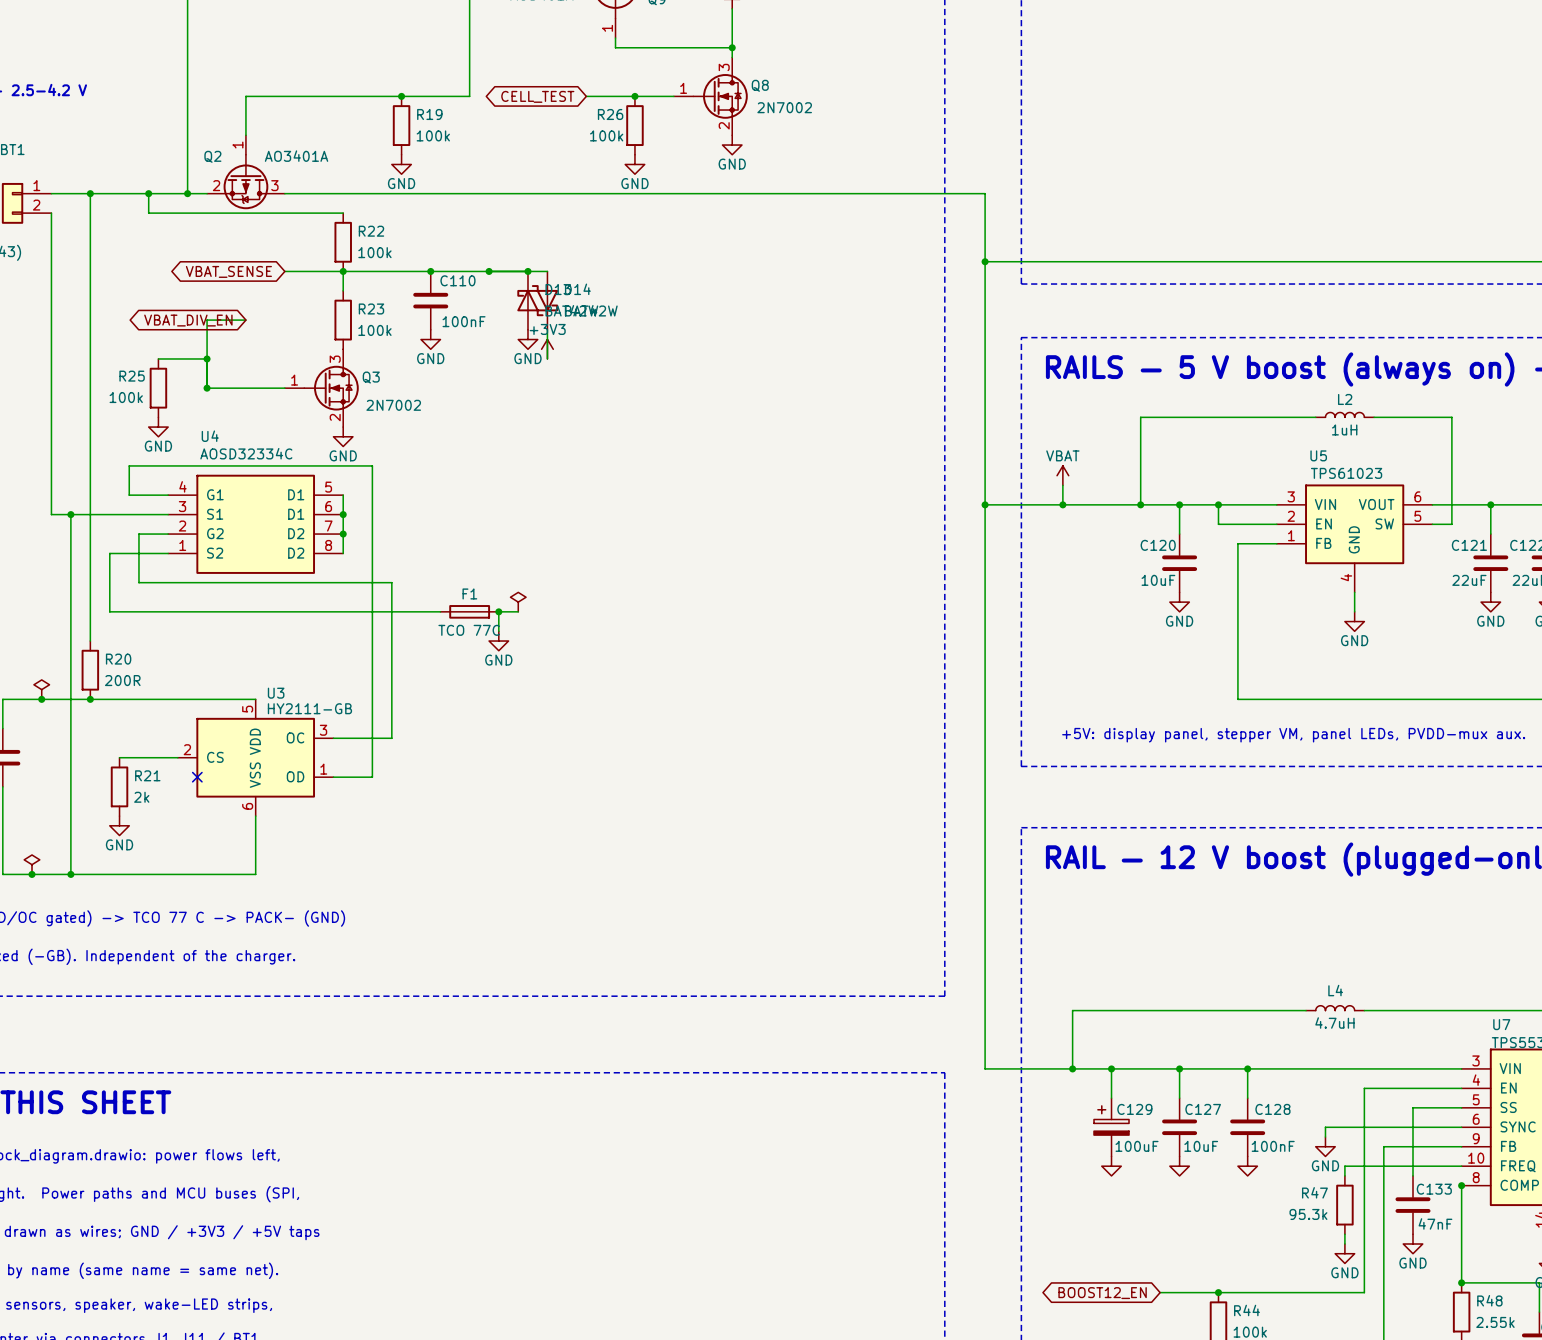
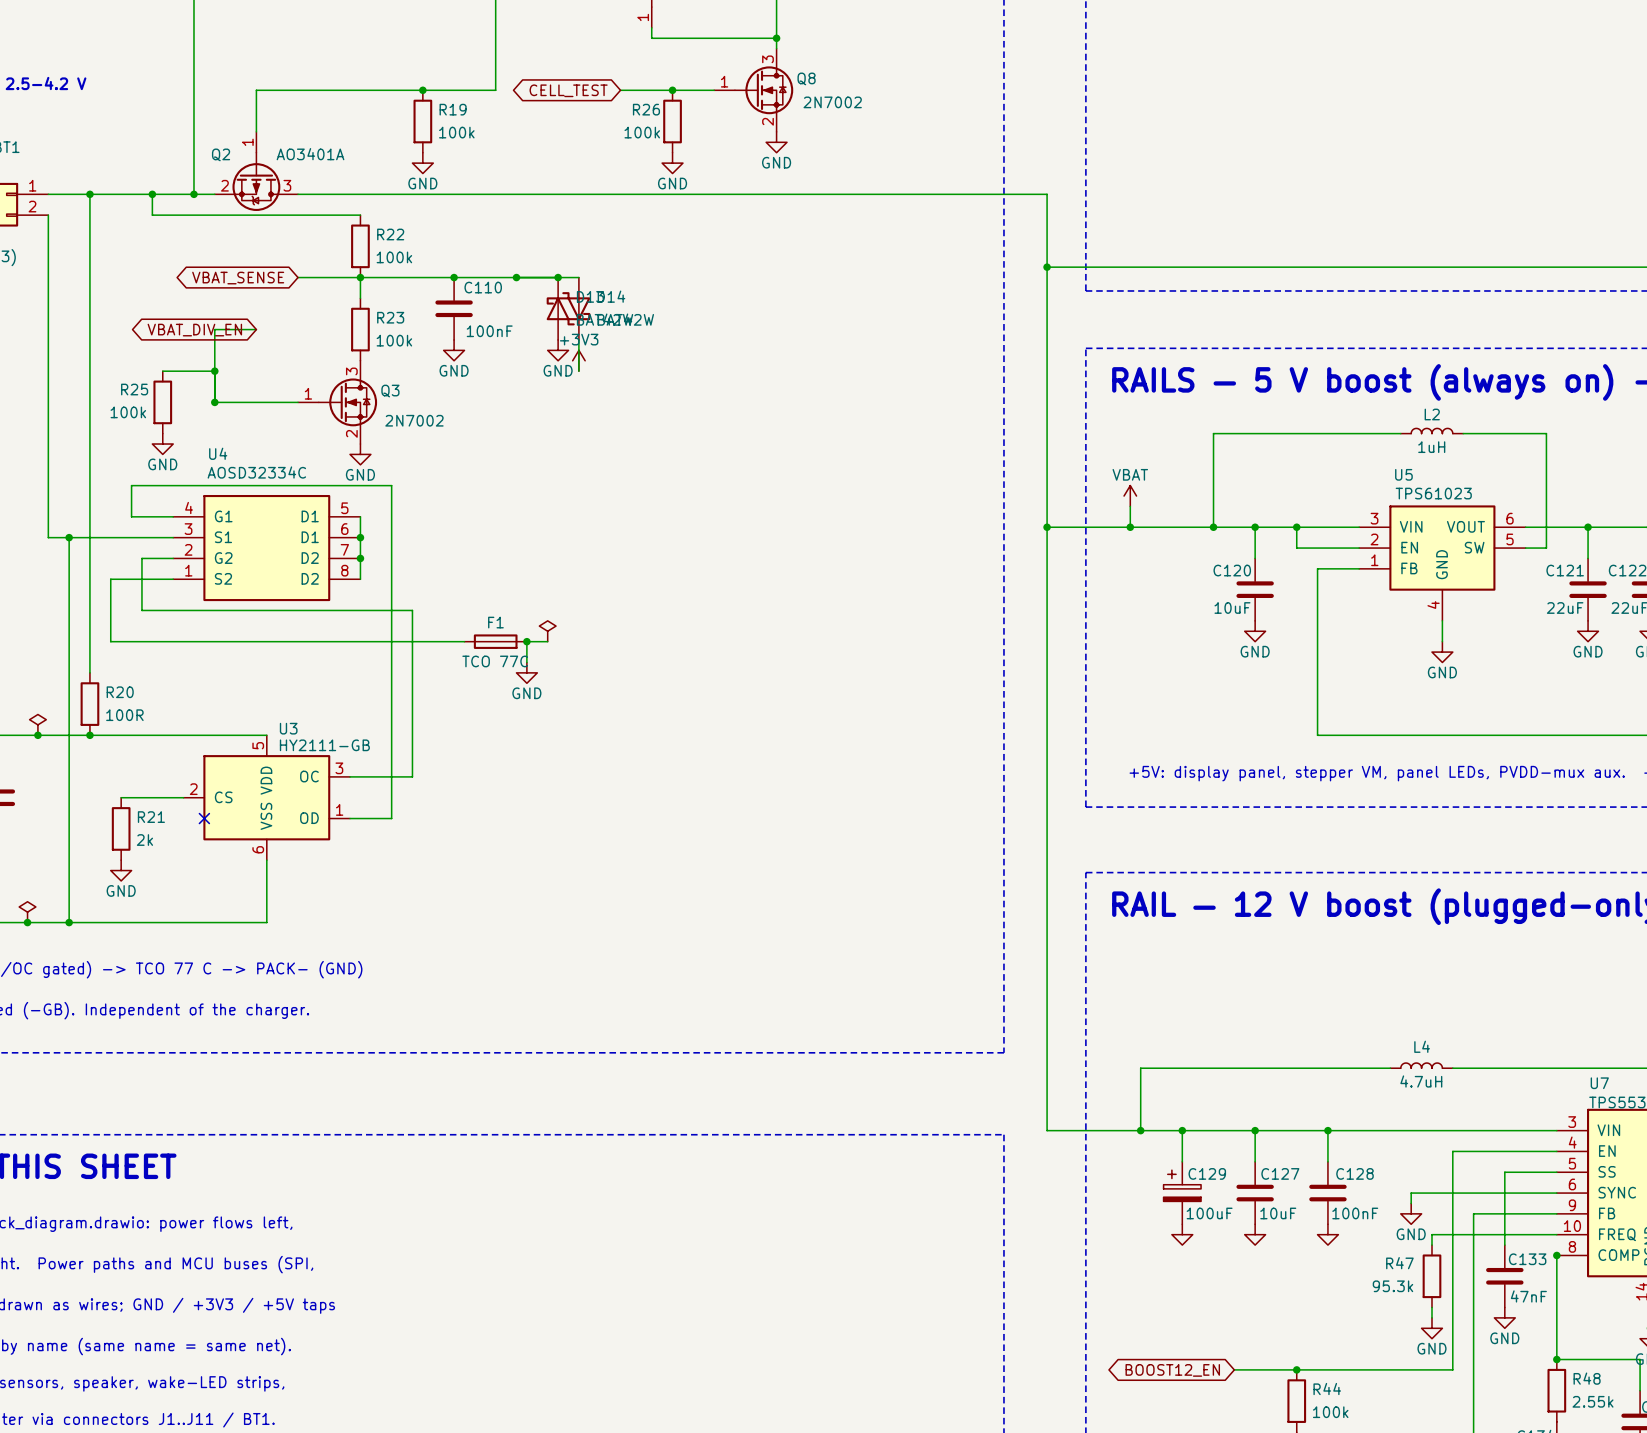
R20 value: 200R (122, 680) -> 100R (124, 715)

